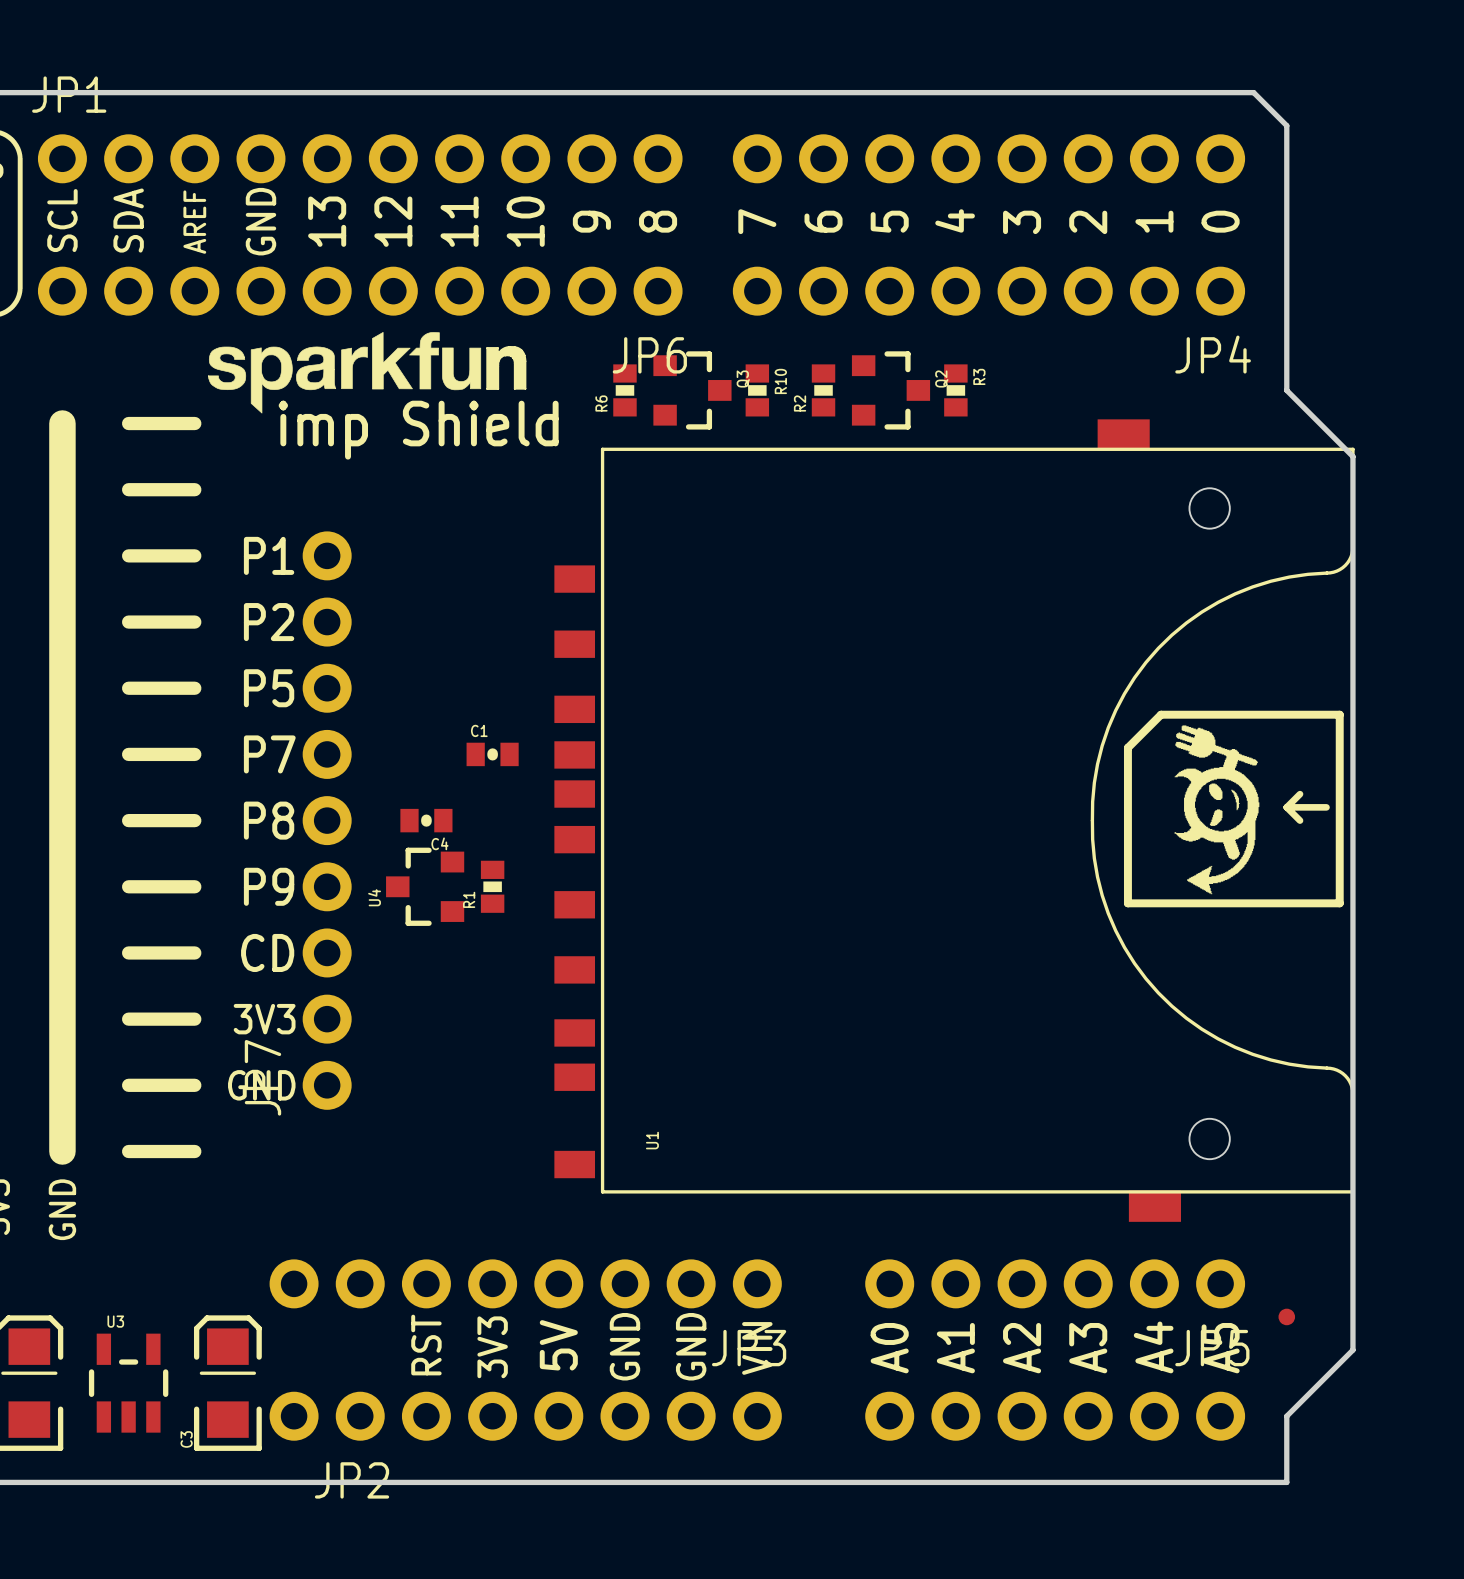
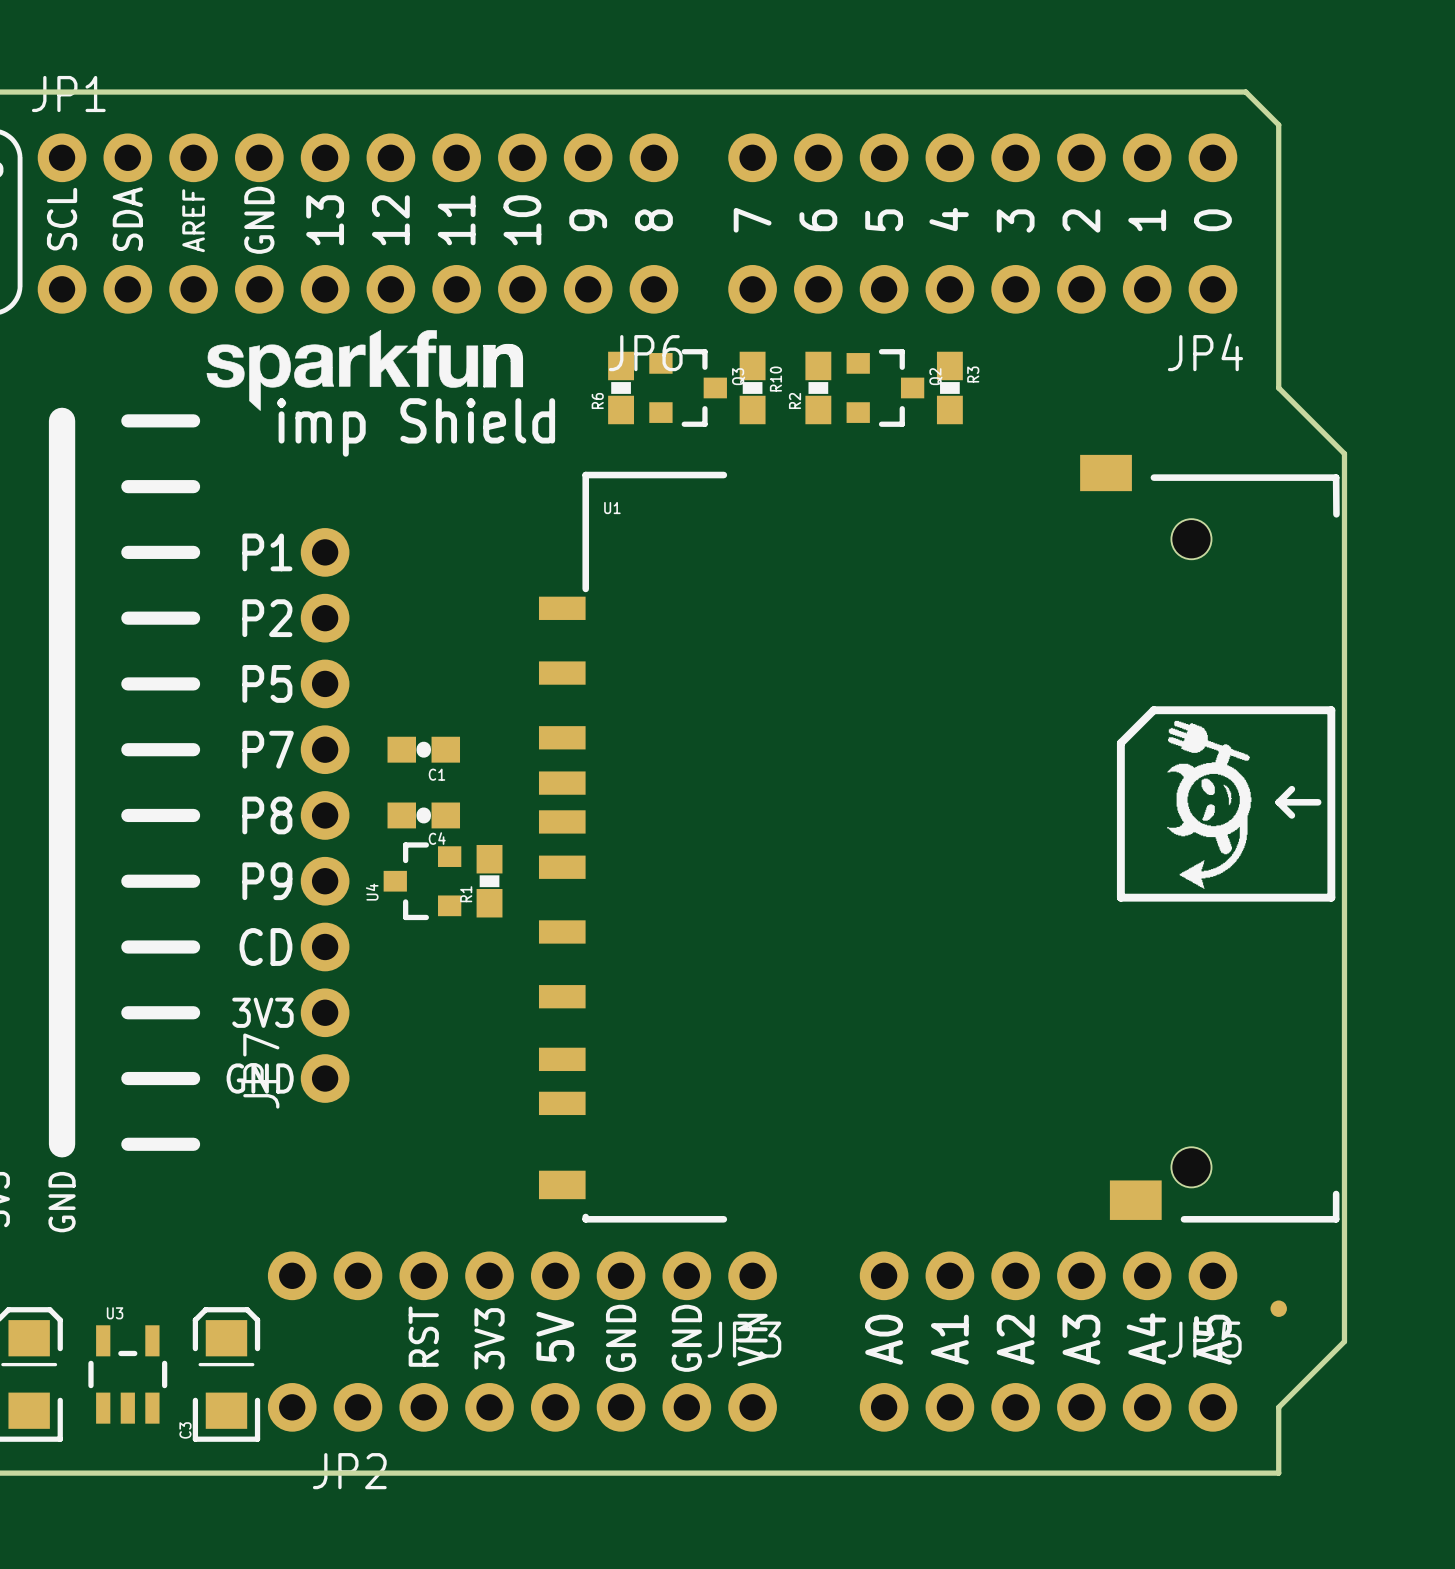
R6 footprint: [613, 364, 637, 417] -> [608, 351, 635, 425]
R10 footprint: [745, 364, 770, 417] -> [739, 351, 766, 425]
R2 footprint: [811, 364, 836, 417] -> [805, 351, 832, 425]
R3 footprint: [944, 364, 968, 417] -> [936, 351, 963, 425]
U1 footprint: [554, 419, 1355, 1222] -> [538, 454, 1340, 1223]
C1 name position: C1 (479, 730) -> C1 (436, 774)
C1 footprint: [466, 742, 519, 767] -> [387, 736, 461, 763]
C4 footprint: [400, 808, 453, 833] -> [387, 802, 461, 829]
R1 footprint: [480, 860, 505, 913] -> [476, 844, 503, 918]
U1 name position: U1 (652, 1140) -> U1 (612, 508)

